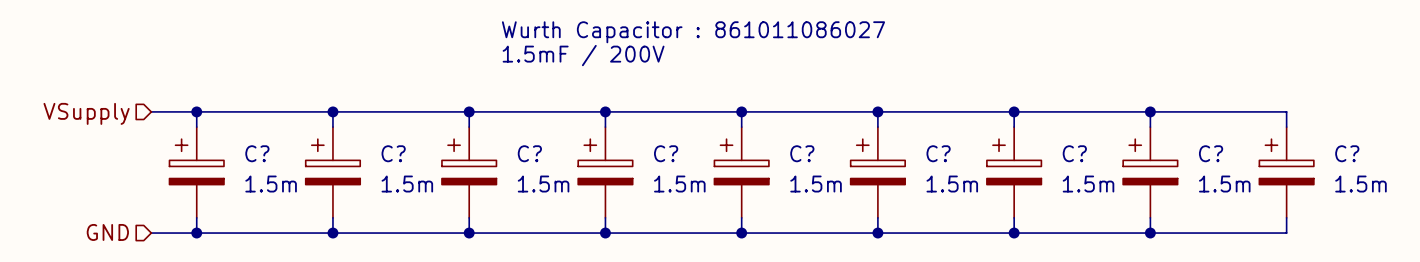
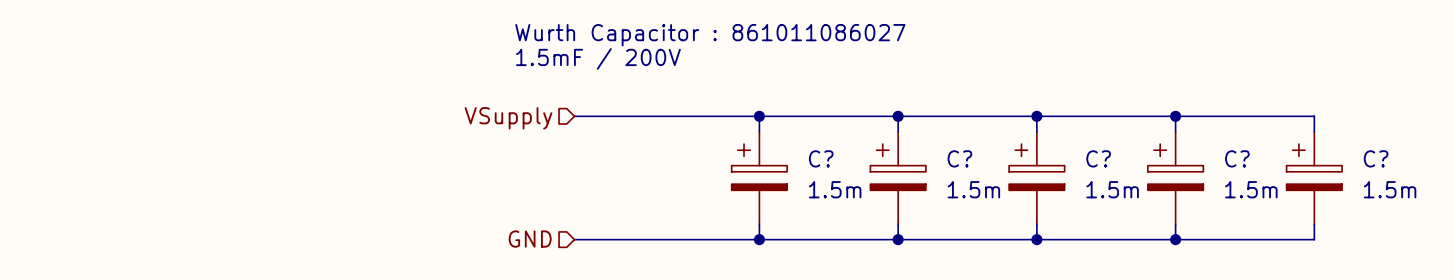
wire: (151, 111) (560, 111) -> none
wire: (196, 111) (196, 127) -> none
junction: (196, 111) -> none
wire: (332, 111) (332, 127) -> none
junction: (332, 111) -> none
wire: (469, 111) (469, 127) -> none
junction: (469, 111) -> none
wire: (605, 111) (605, 127) -> none
junction: (605, 111) -> none
hierarchical label: VSupply (86, 113) -> none
hierarchical label: none -> VSupply (508, 118)
C?: 1.5m (196, 172) -> none
C?: 1.5m (332, 172) -> none
C?: 1.5m (469, 172) -> none
C?: 1.5m (605, 172) -> none
wire: (196, 217) (196, 233) -> none
wire: (332, 217) (332, 233) -> none
wire: (469, 217) (469, 233) -> none
wire: (605, 217) (605, 233) -> none
hierarchical label: GND (107, 232) -> none
hierarchical label: none -> GND (530, 239)
wire: (151, 233) (560, 233) -> none
junction: (196, 233) -> none
junction: (332, 233) -> none
junction: (469, 233) -> none
junction: (605, 233) -> none

